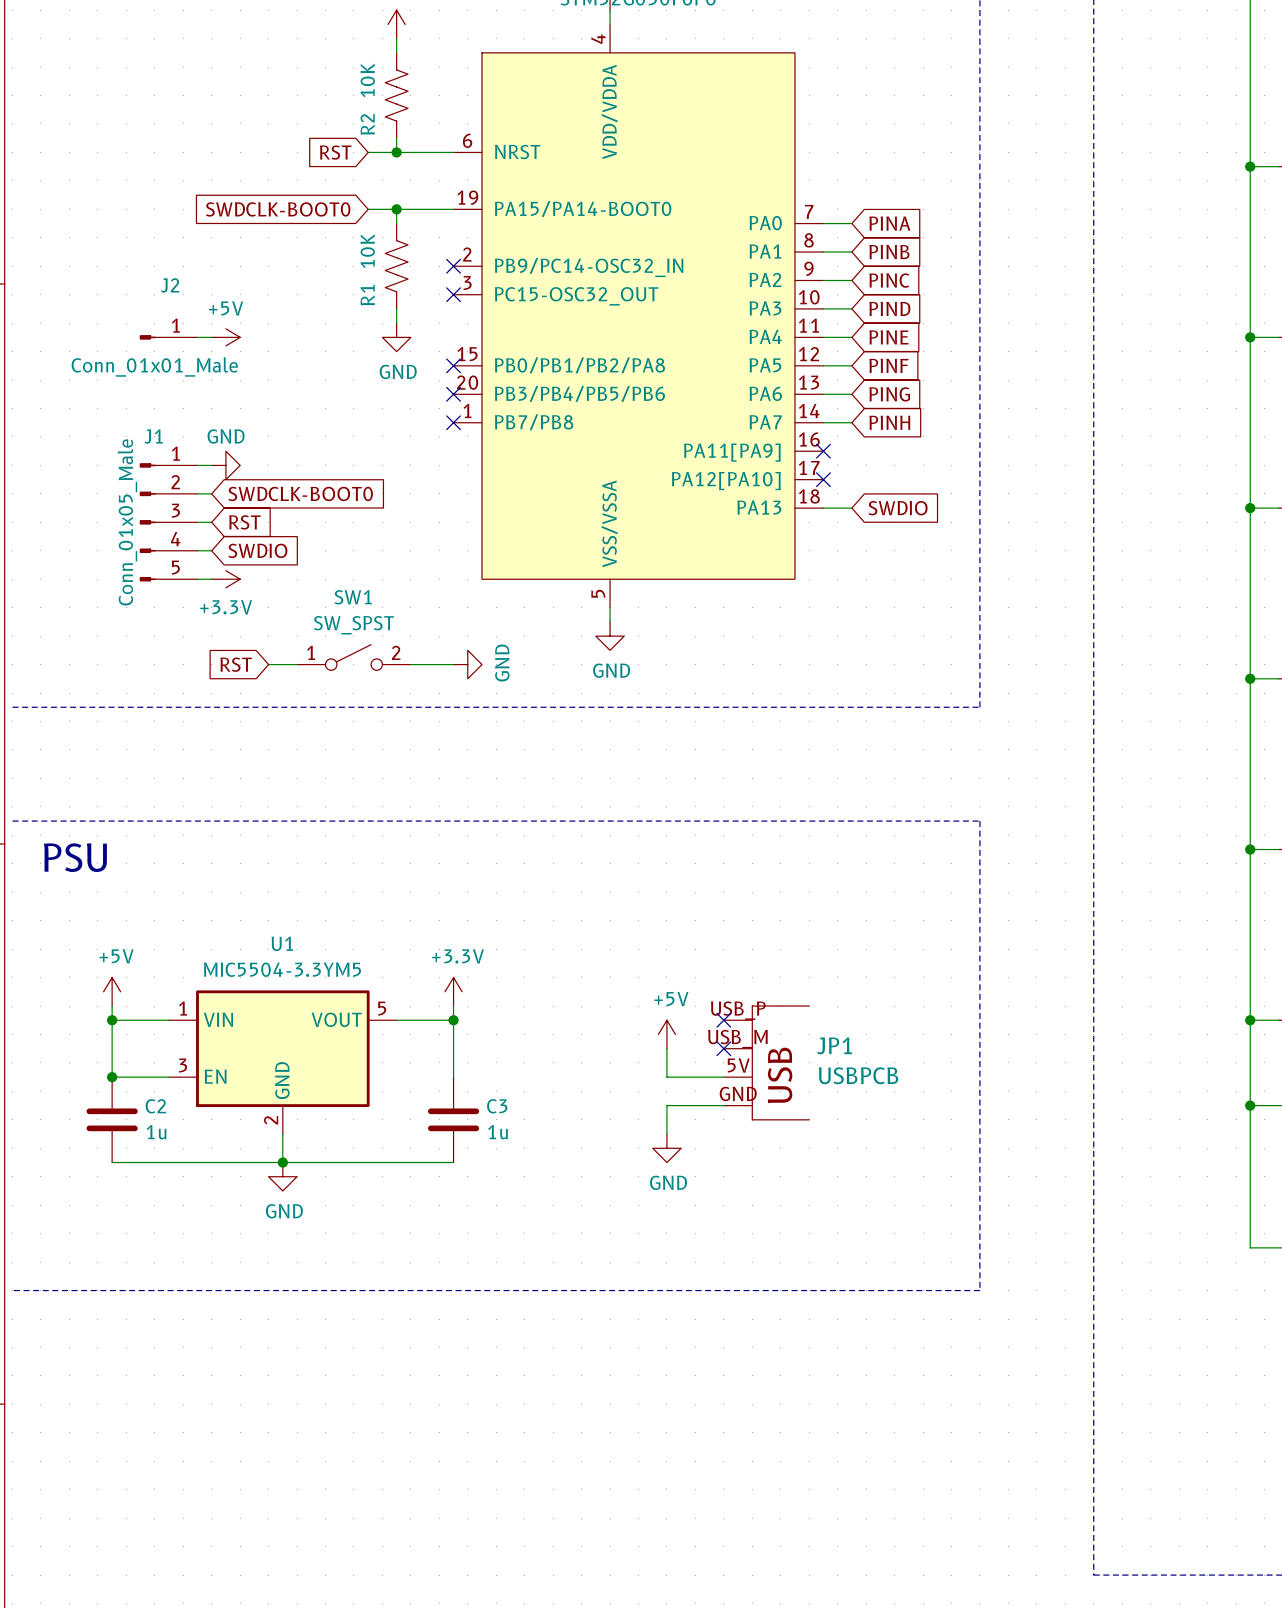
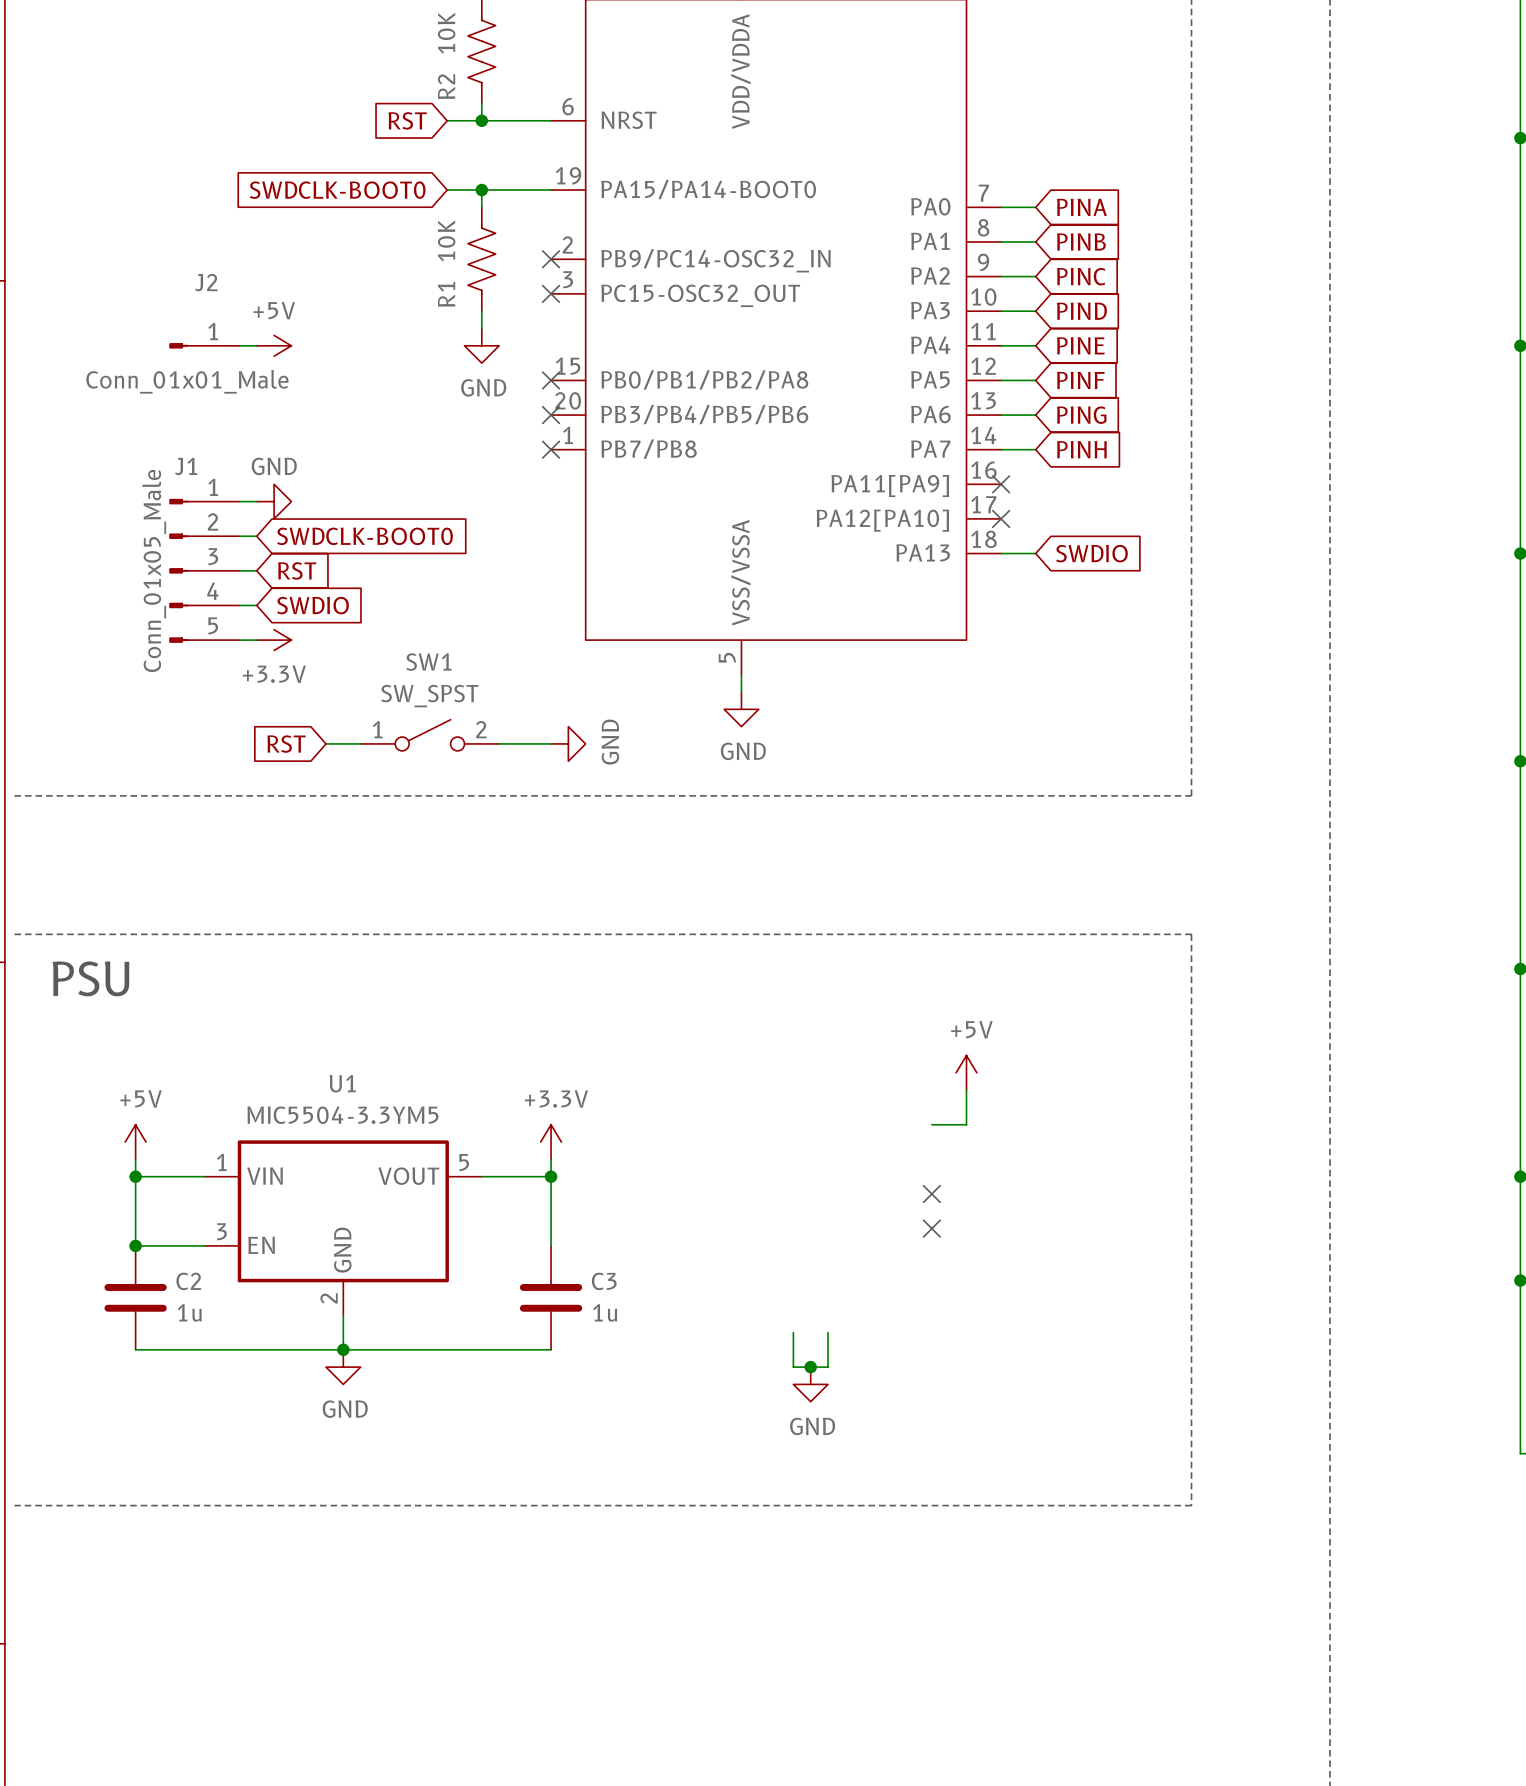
wire: none -> (966, 1090) (966, 1124) (931, 1124)
no-connect mark: (723, 1020) -> none
power symbol position: +5V (666, 1034) -> +5V (966, 1072)
no-connect mark: none -> (931, 1194)
wire: (666, 1048) (666, 1077) (723, 1077) -> none
no-connect mark: (723, 1048) -> none
no-connect mark: none -> (931, 1228)
JP1: USBPCB (766, 1062) -> none
wire: (723, 1105) (666, 1105) (666, 1134) -> none
wire: none -> (793, 1332) (793, 1367) (828, 1367) (828, 1332)
power symbol position: GND (666, 1148) -> GND (810, 1384)
junction: none -> (810, 1367)

